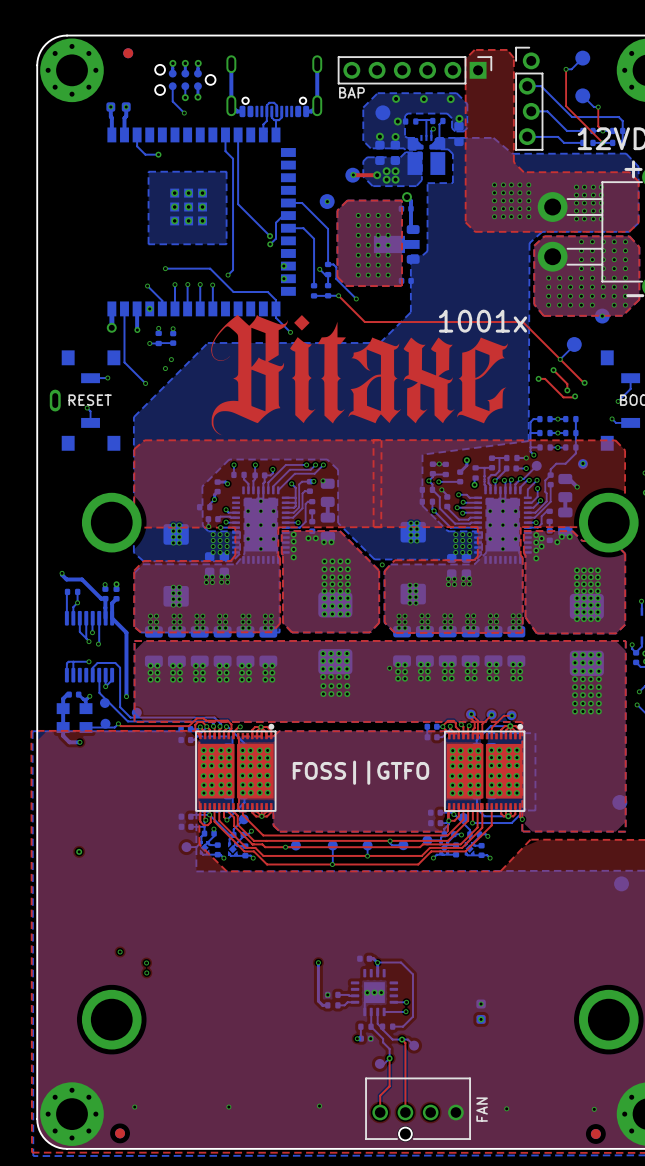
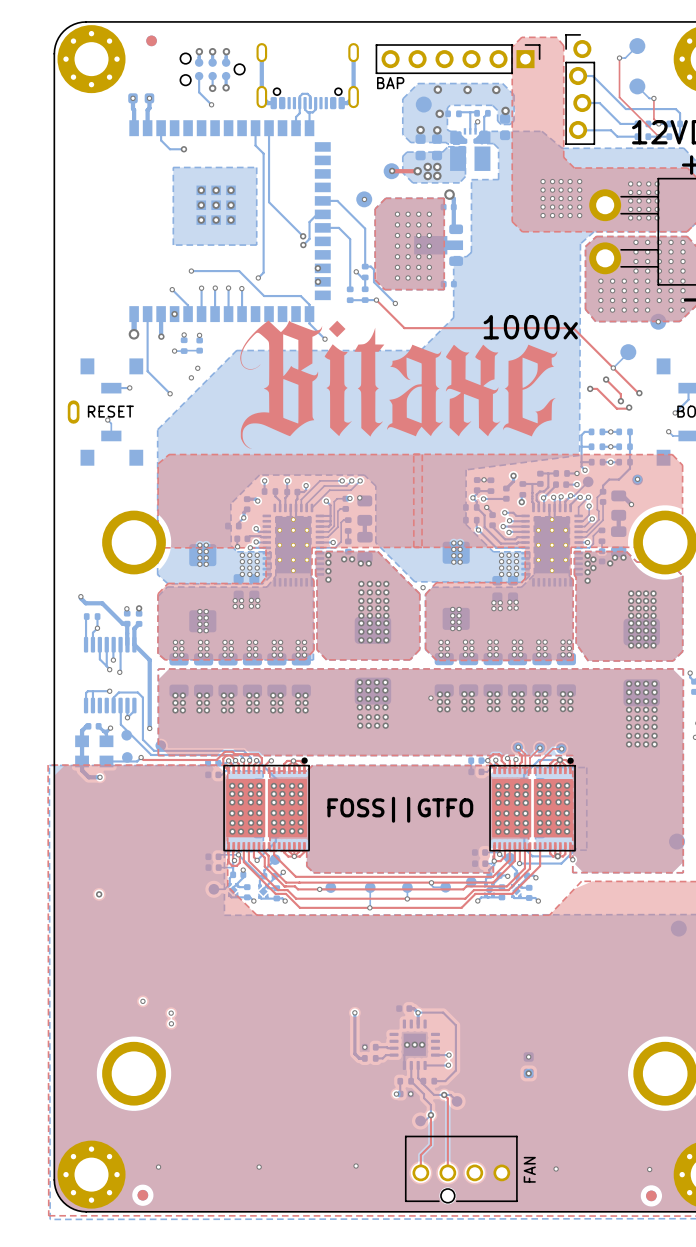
text: 1001x (483, 321) -> 1000x (530, 327)

